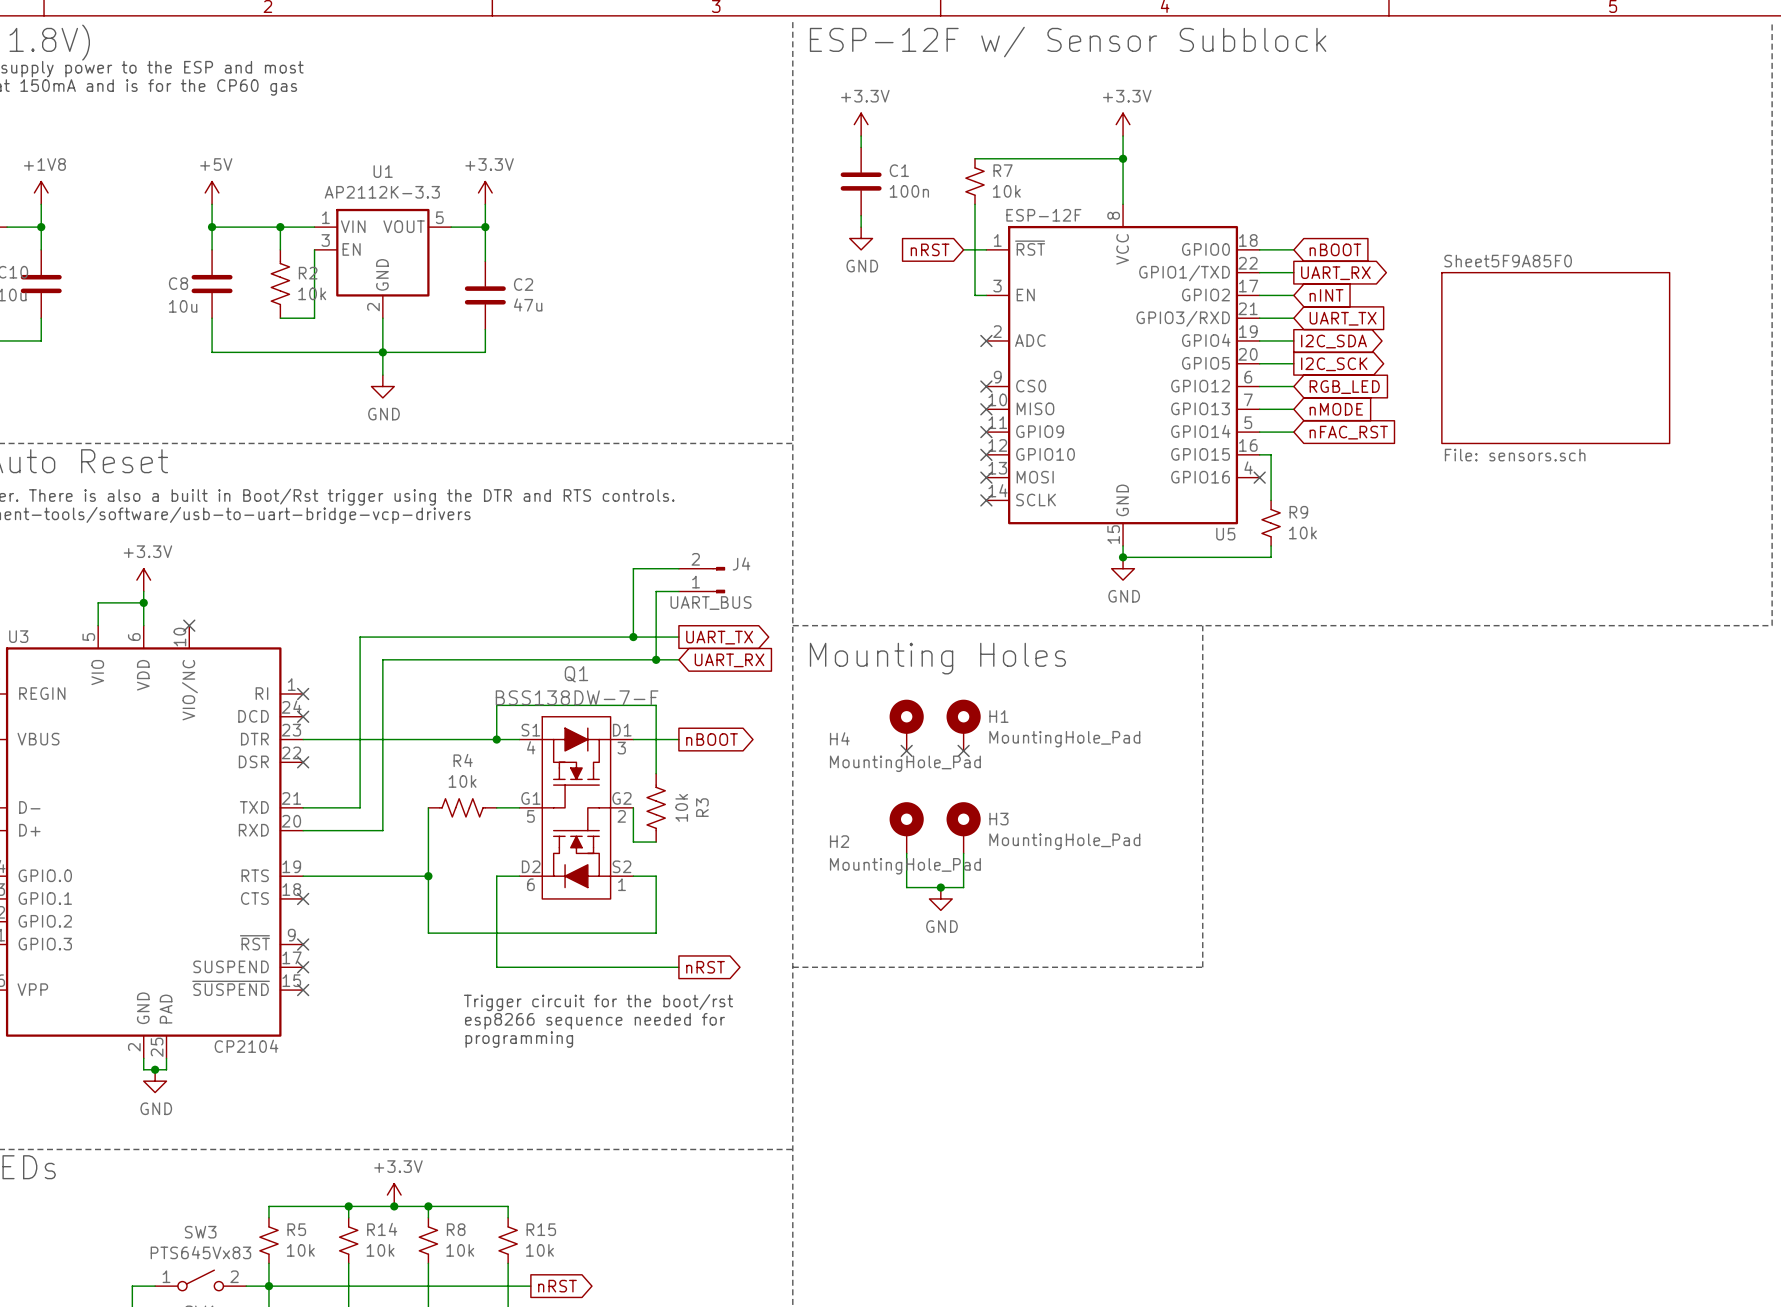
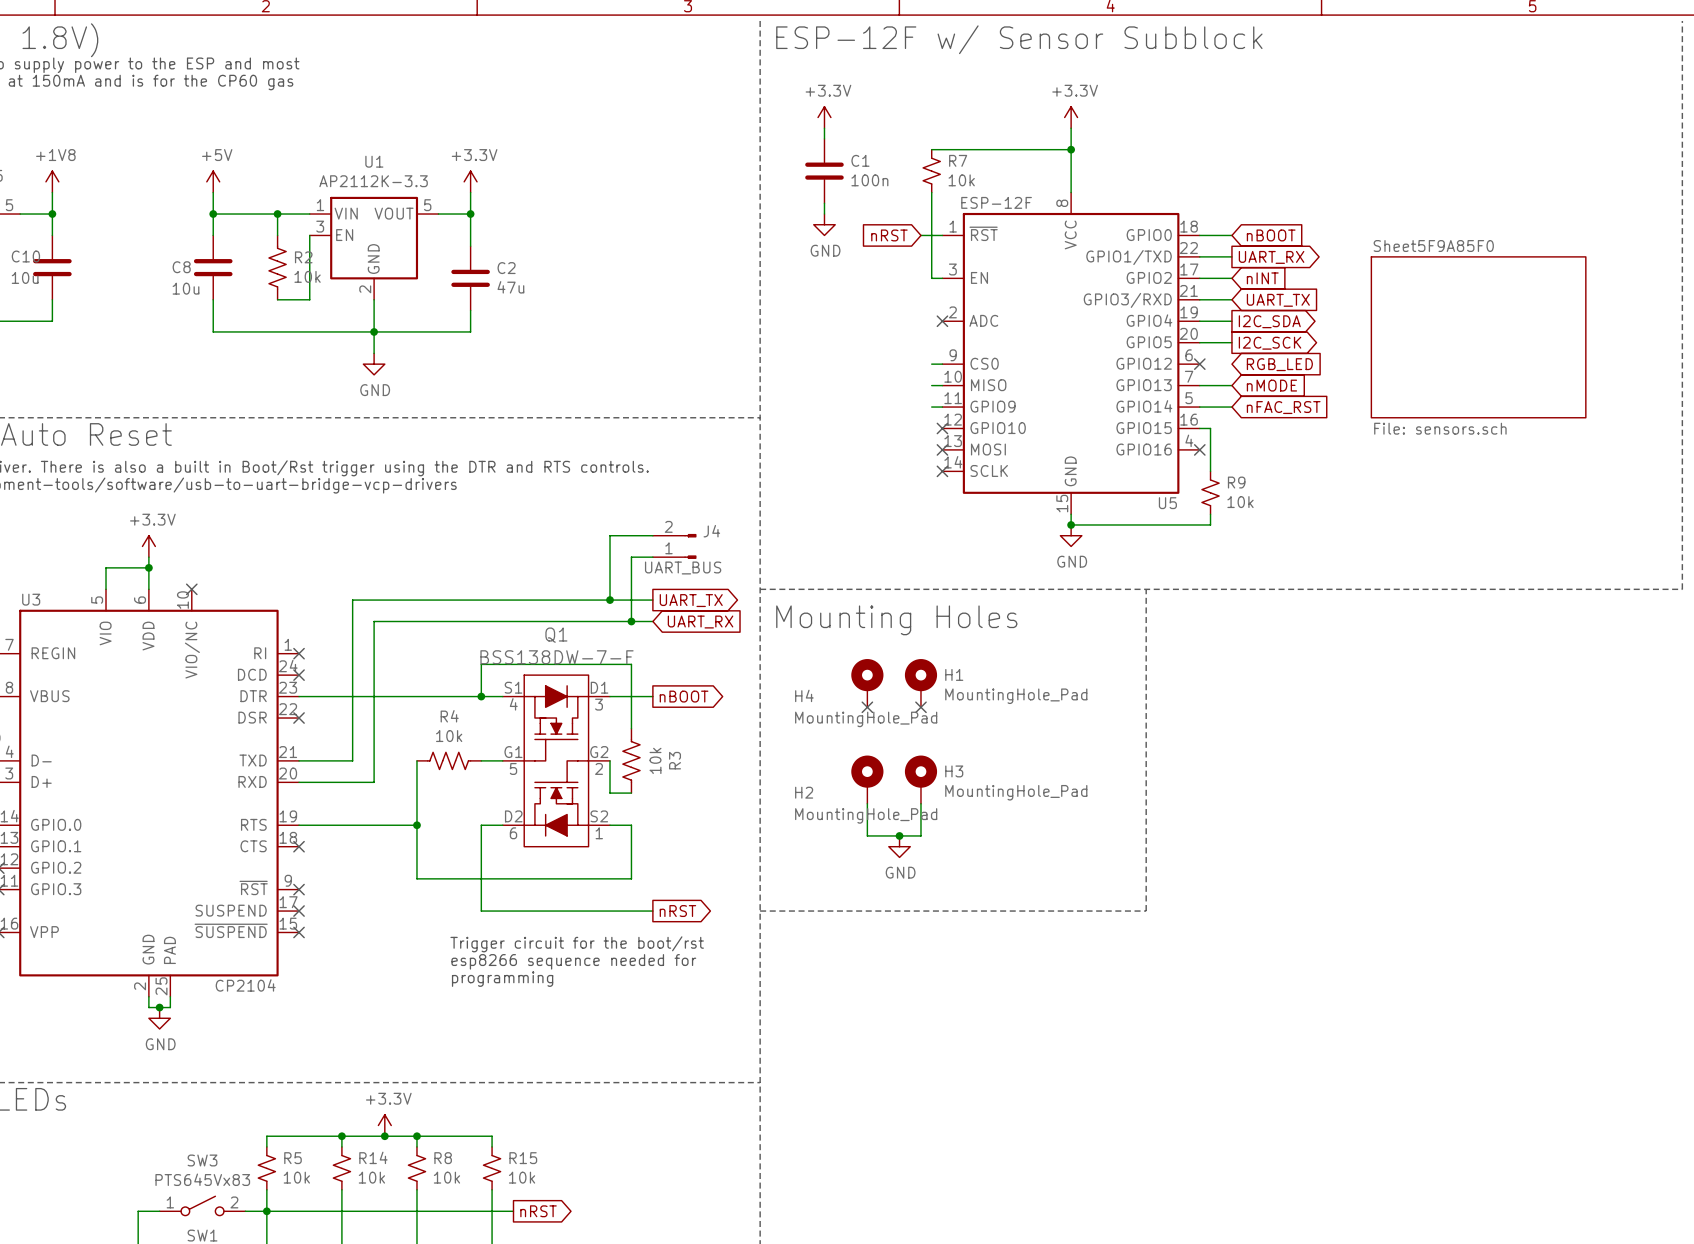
wire: none -> (931, 364) (942, 364)
no-connect mark: (986, 386) -> none
wire: (1259, 386) (1293, 386) -> none
no-connect mark: none -> (1199, 364)
wire: none -> (931, 385) (942, 385)
no-connect mark: (986, 409) -> none
wire: none -> (931, 407) (942, 407)
no-connect mark: (986, 432) -> none

